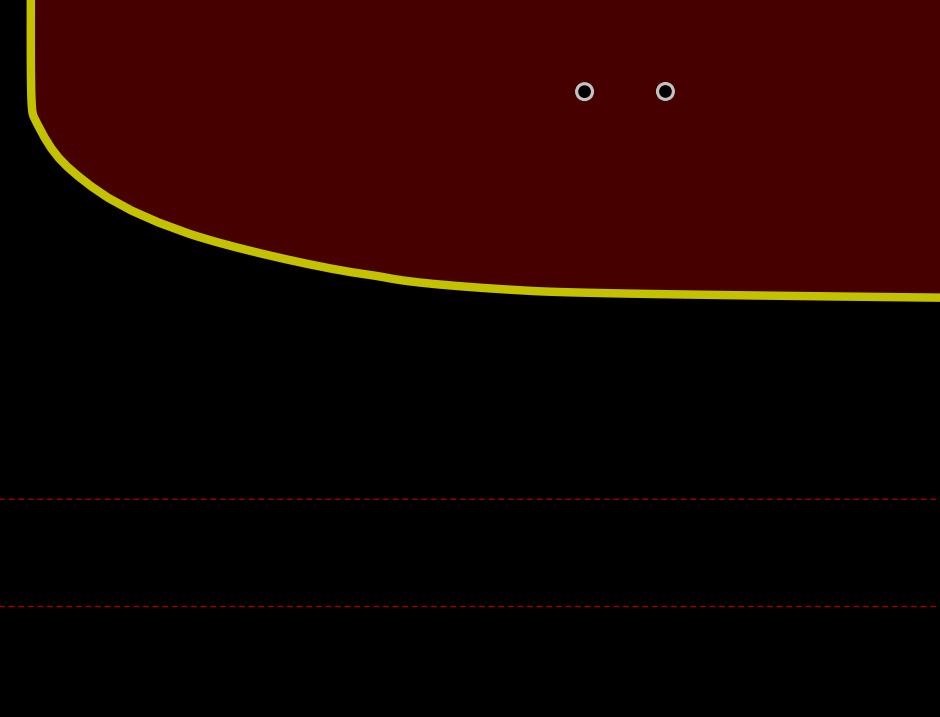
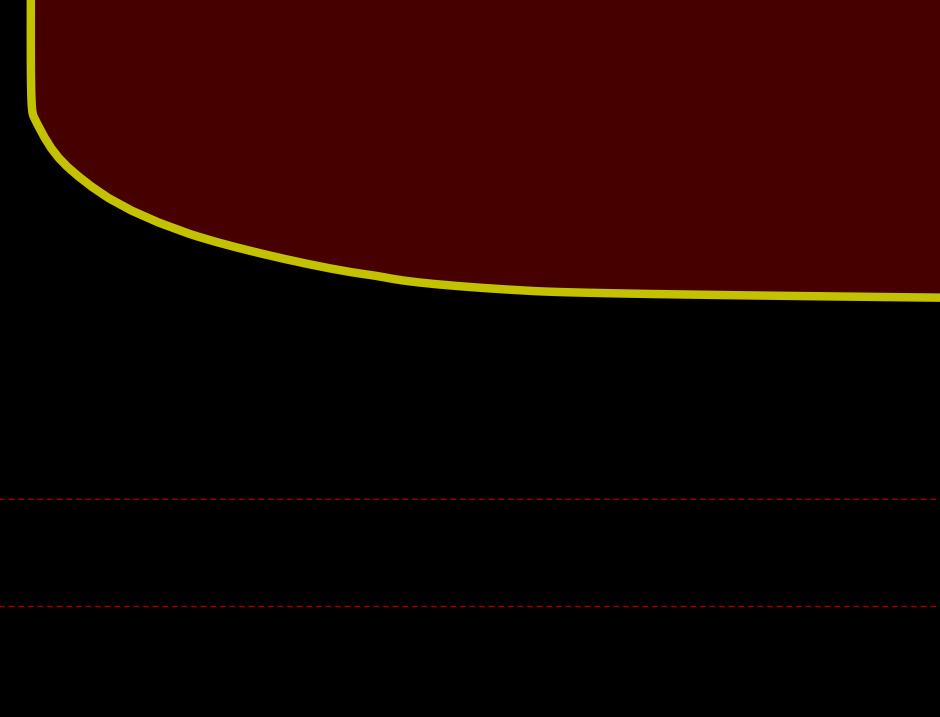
via: (584, 91) -> none
via: (665, 91) -> none

